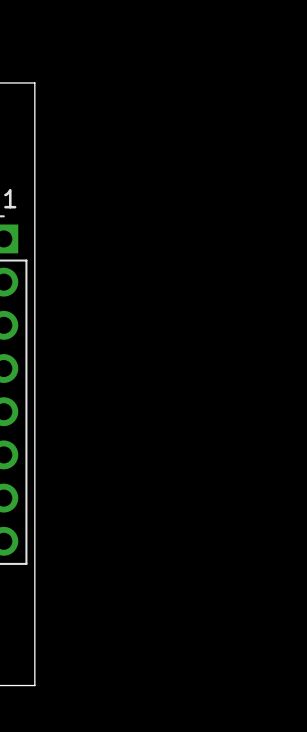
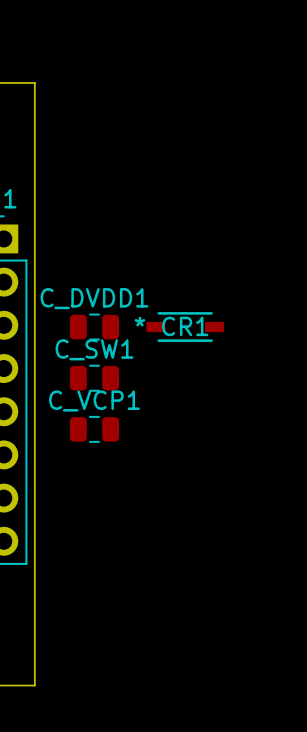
C_DVDD1: none -> (94, 327)
CR1: none -> (185, 327)
C_SW1: none -> (94, 378)
C_VCP1: none -> (94, 429)

